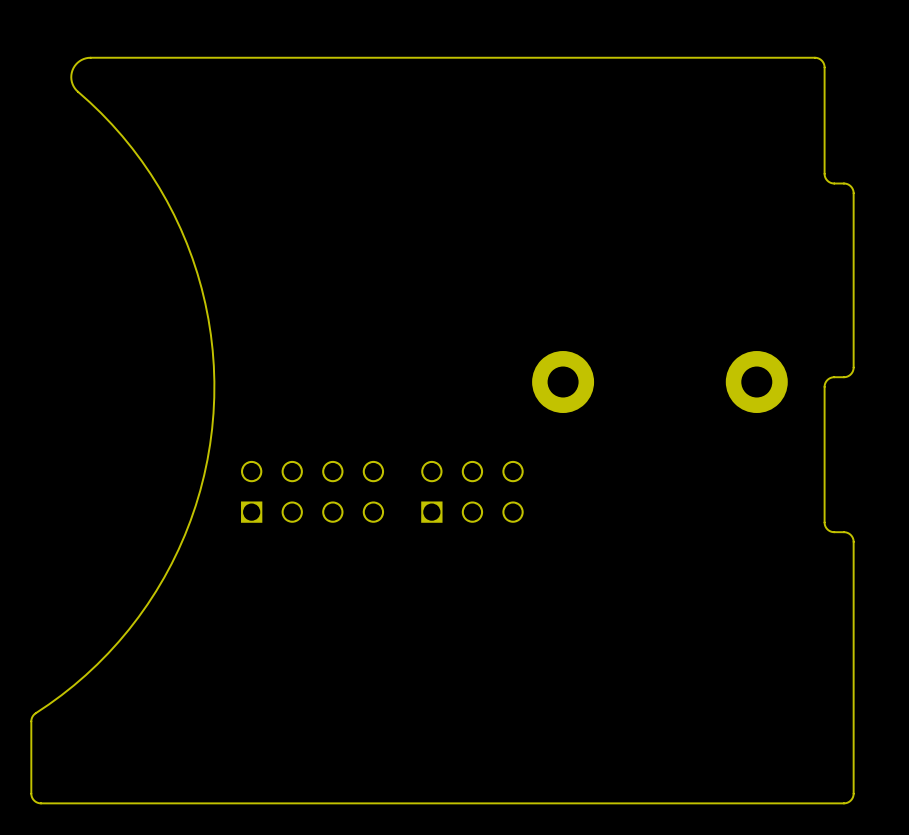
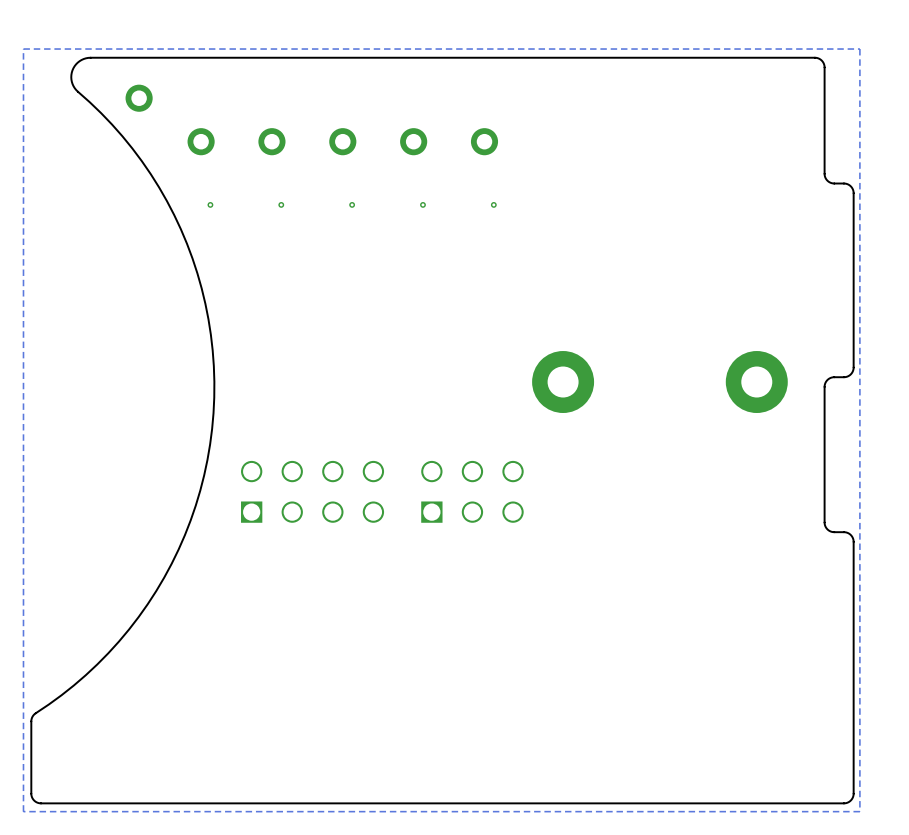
zone outline: none -> (859, 49) (23, 49) (23, 811) (859, 811) (859, 49)
part: none -> (139, 98)
part: none -> (201, 141)
part: none -> (271, 141)
part: none -> (342, 141)
part: none -> (413, 141)
part: none -> (484, 141)
via: none -> (210, 204)
via: none -> (281, 204)
via: none -> (352, 204)
via: none -> (422, 204)
via: none -> (493, 204)

